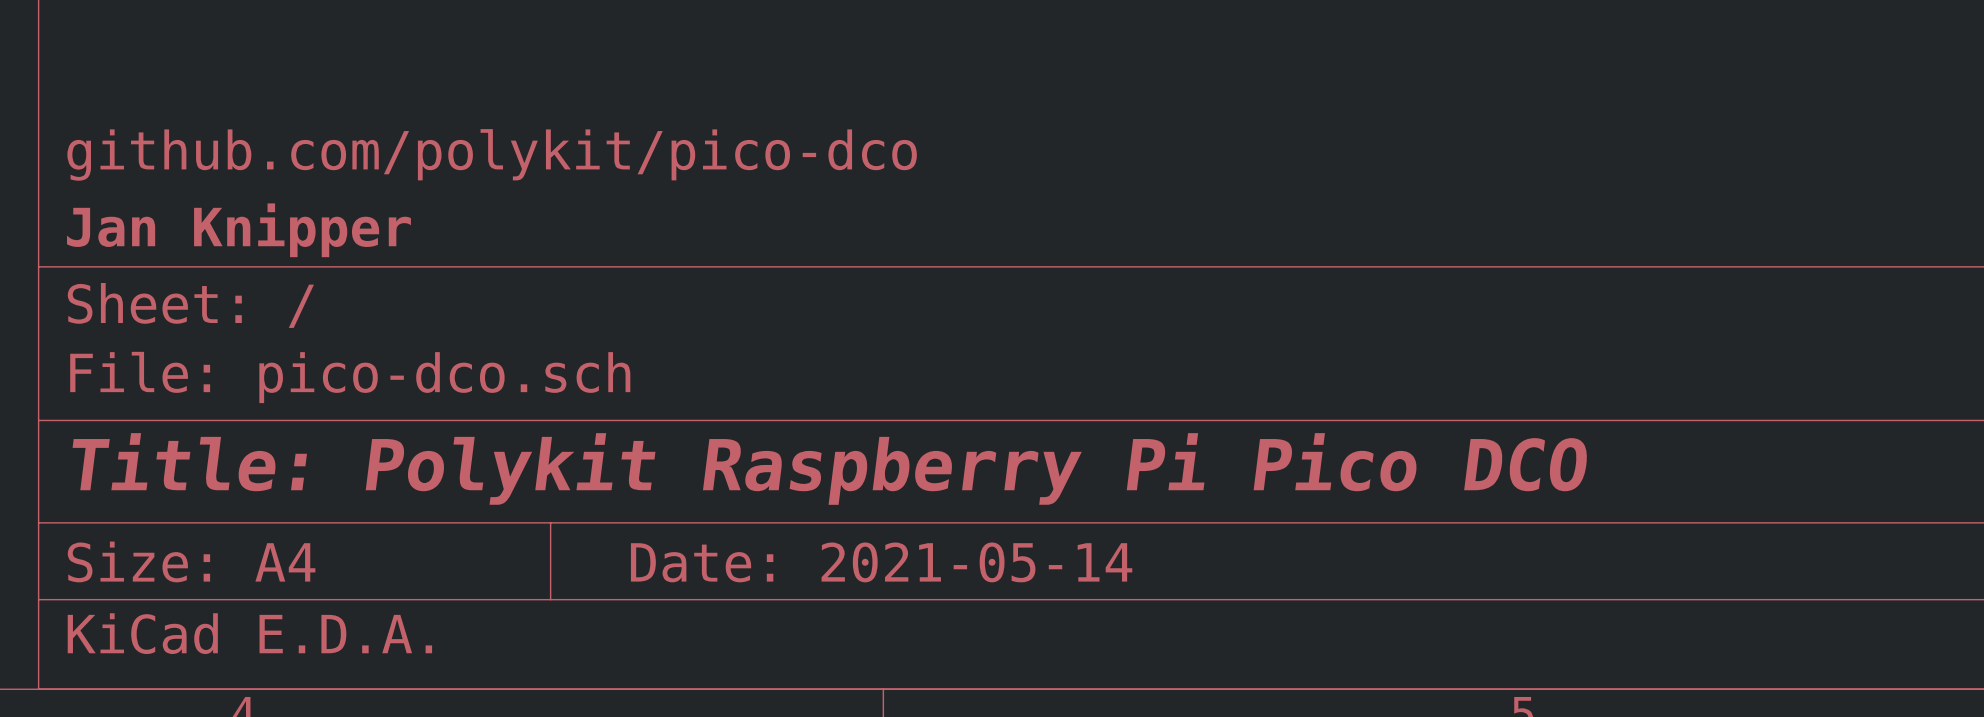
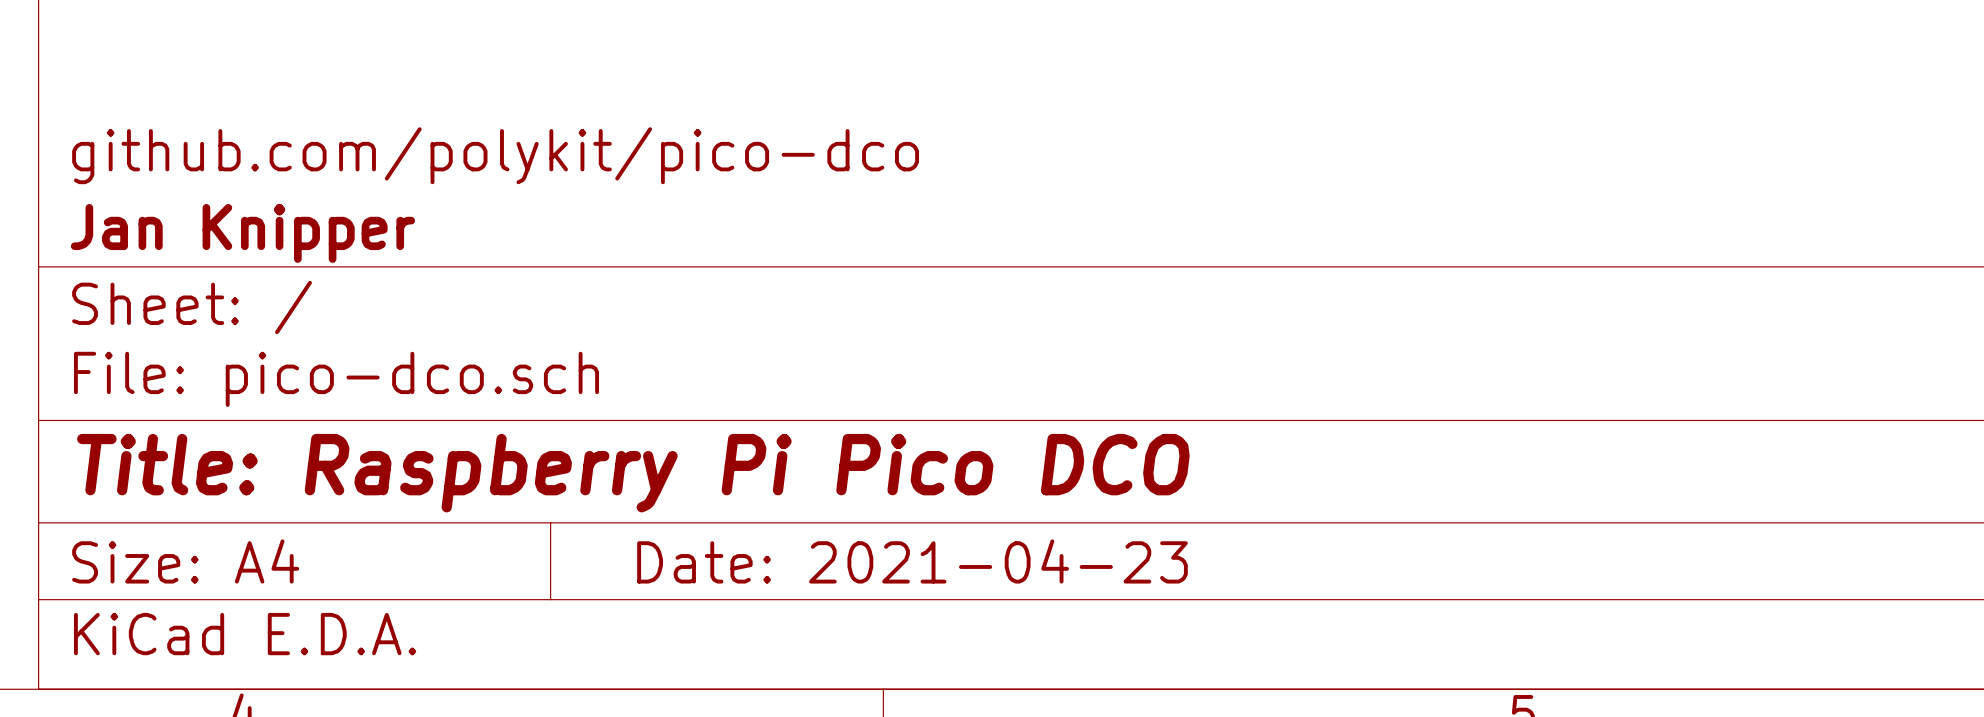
title block: Title: Polykit Raspberry Pi Pico DCO (830, 468) -> Title: Raspberry Pi Pico DCO (633, 473)
title block: Date: 2021-05-14 (881, 562) -> Date: 2021-04-23 (912, 561)

